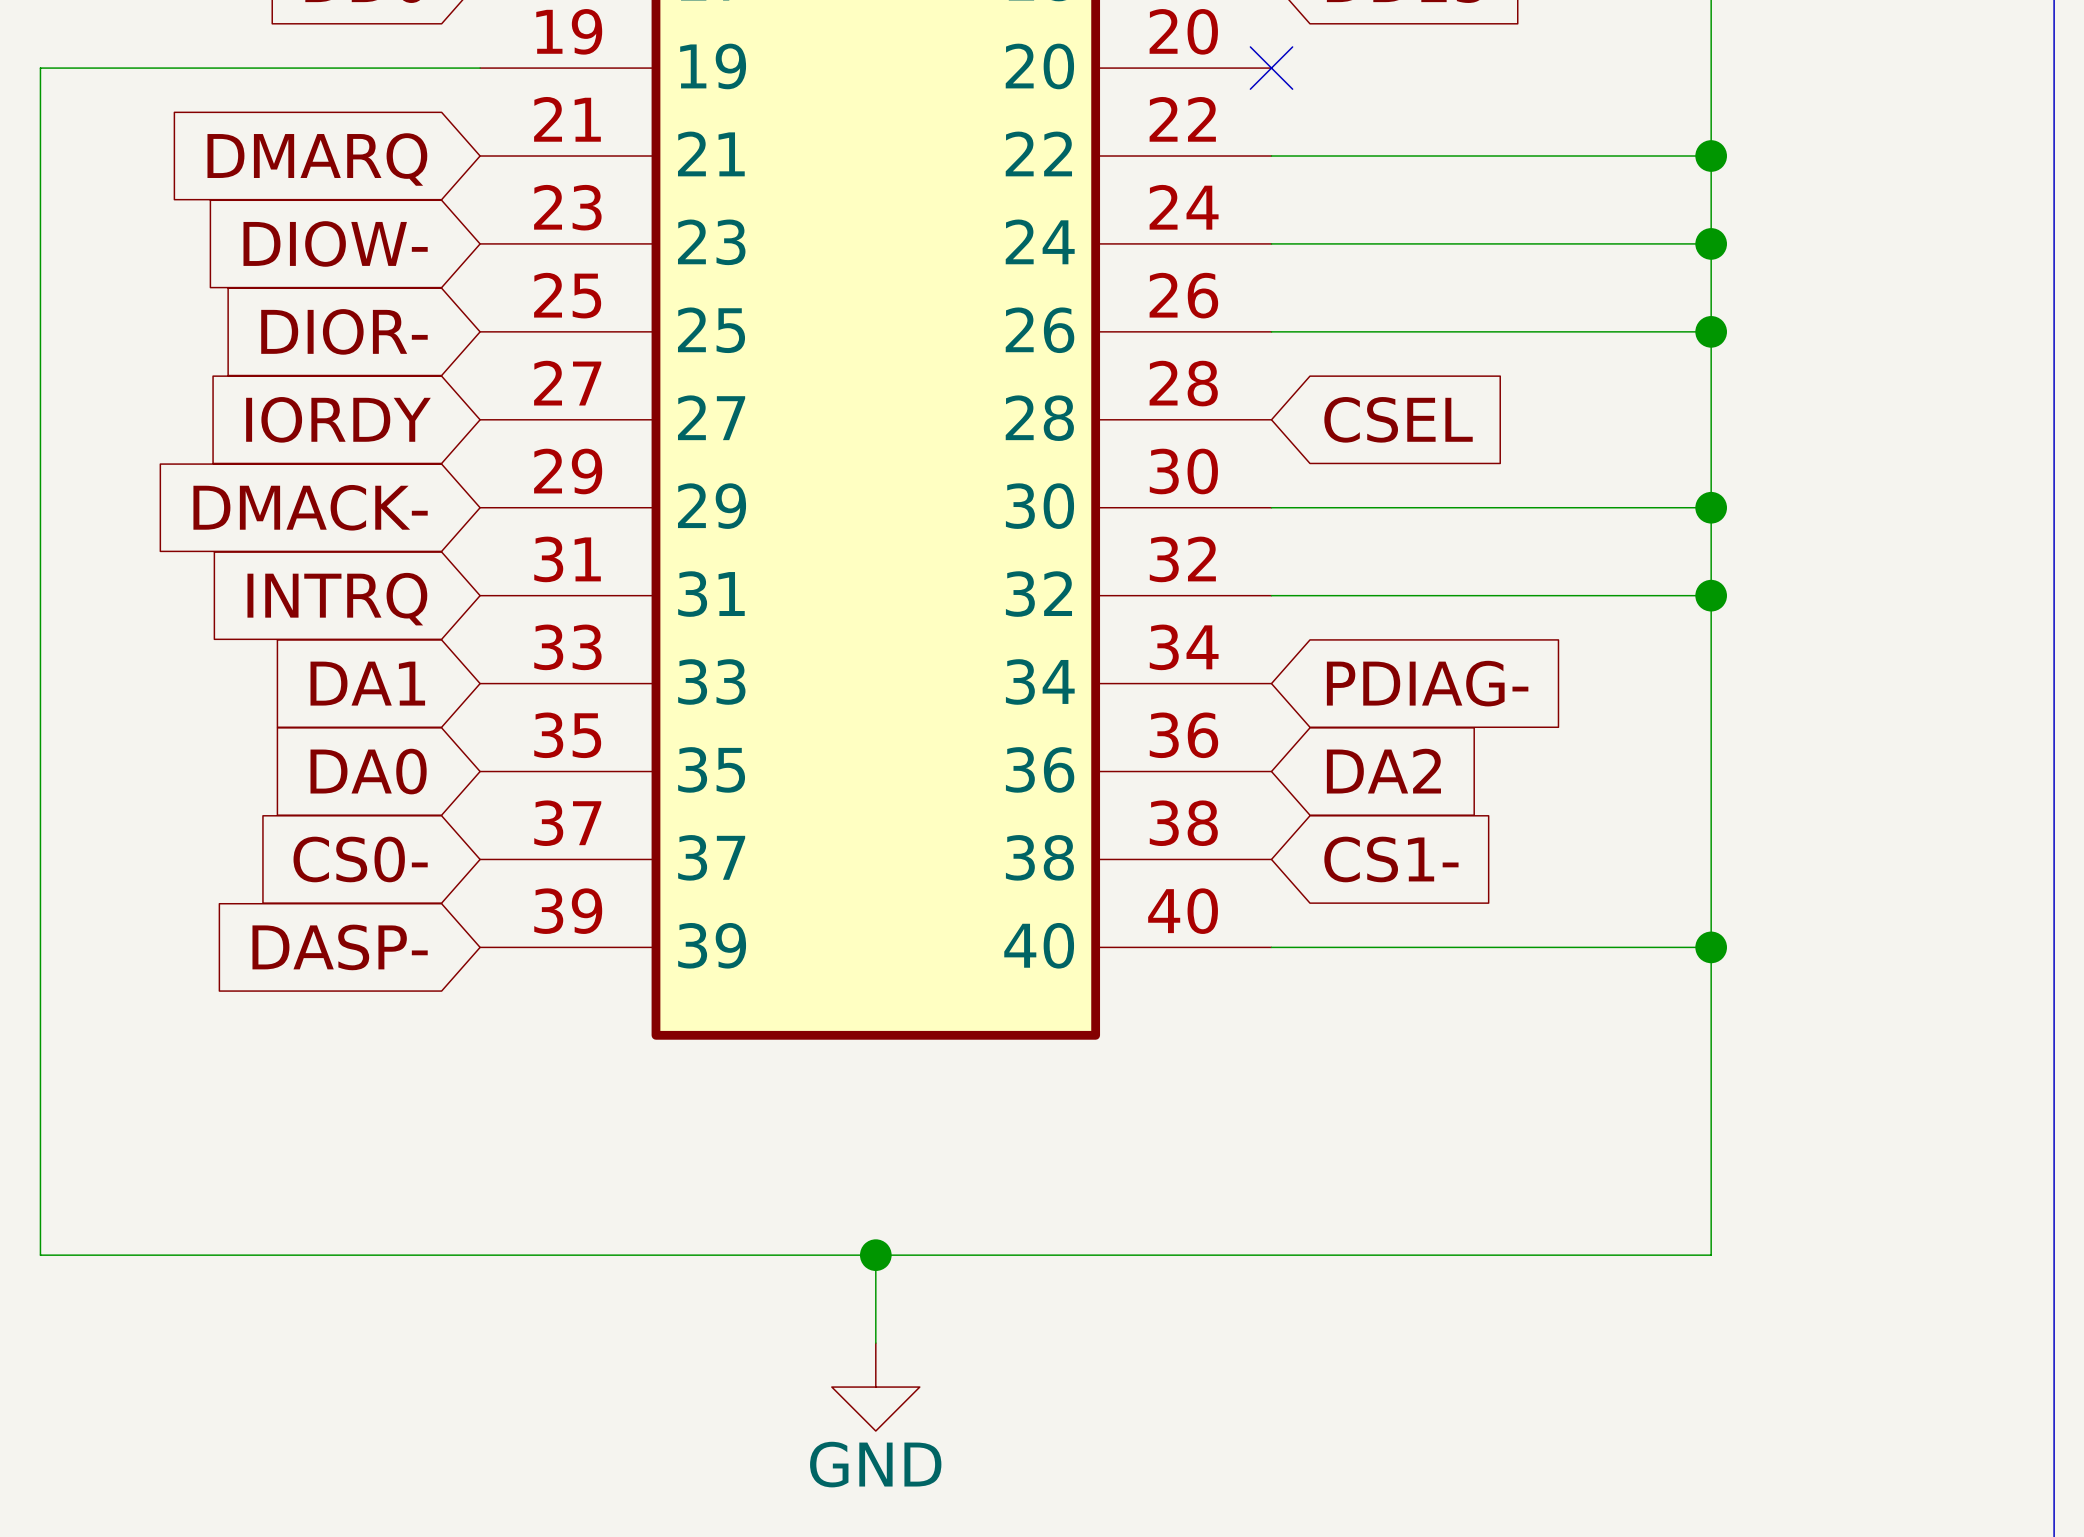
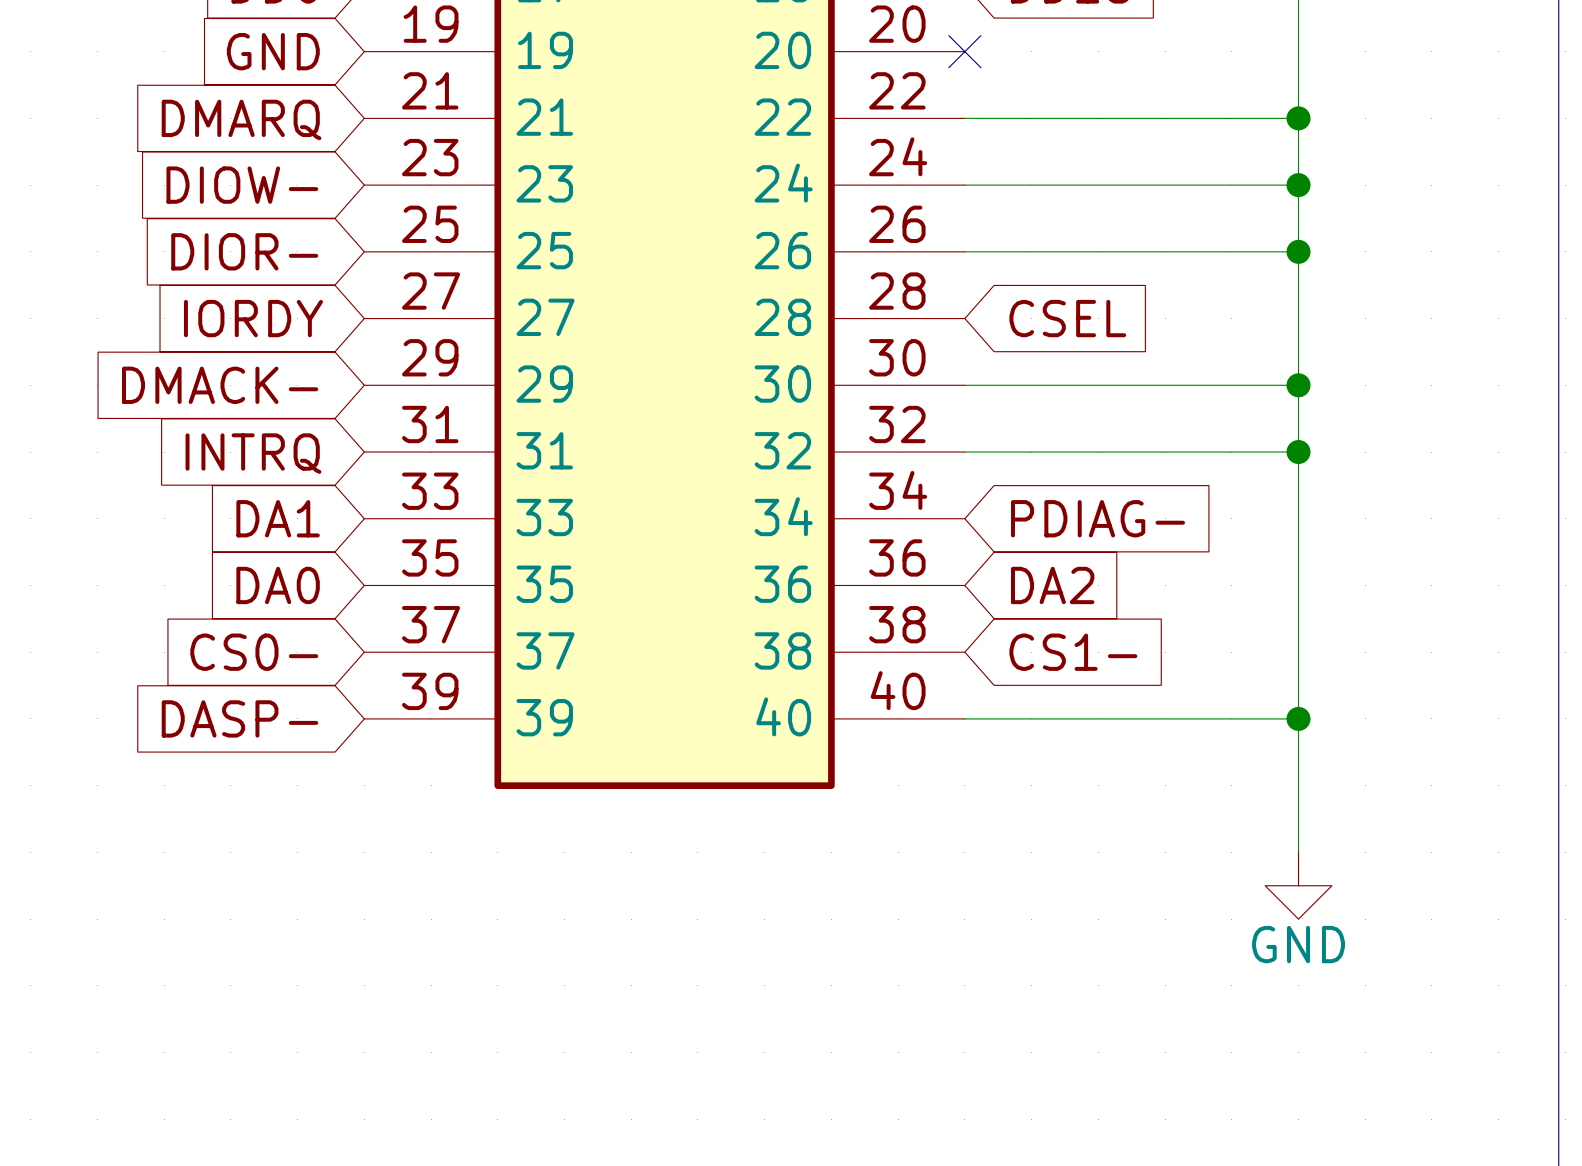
global label: none -> GND (273, 51)
wire: (480, 68) (40, 68) (40, 1255) (1711, 1255) (1711, 1123) -> none
wire: (875, 1255) (875, 1343) -> none
junction: (875, 1255) -> none
power symbol position: GND (875, 1387) -> GND (1298, 885)

